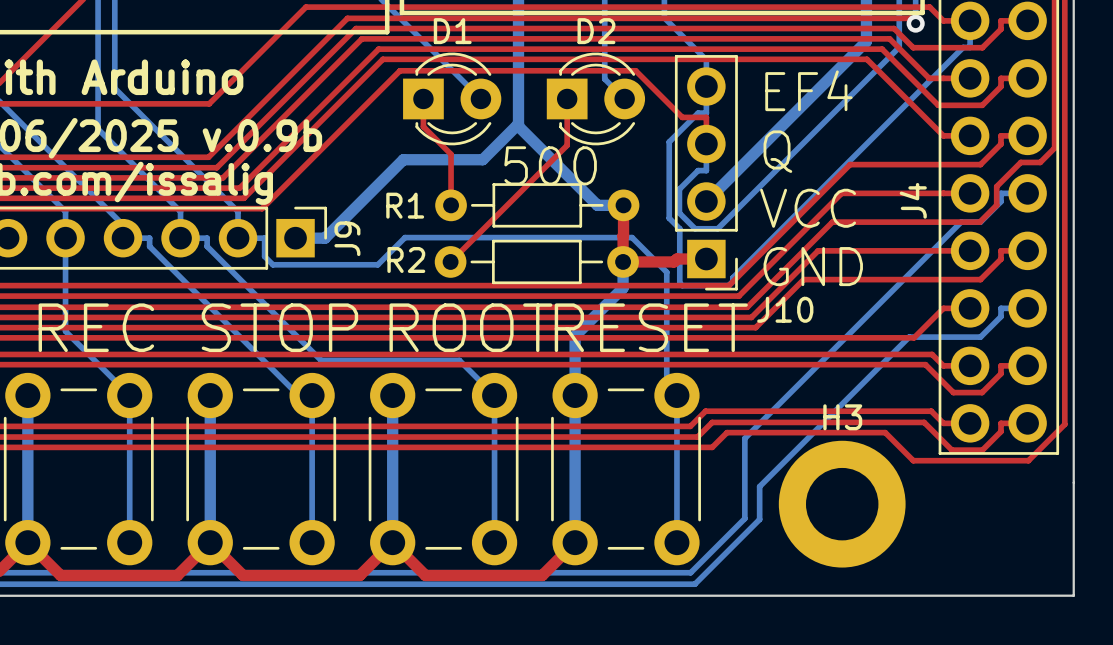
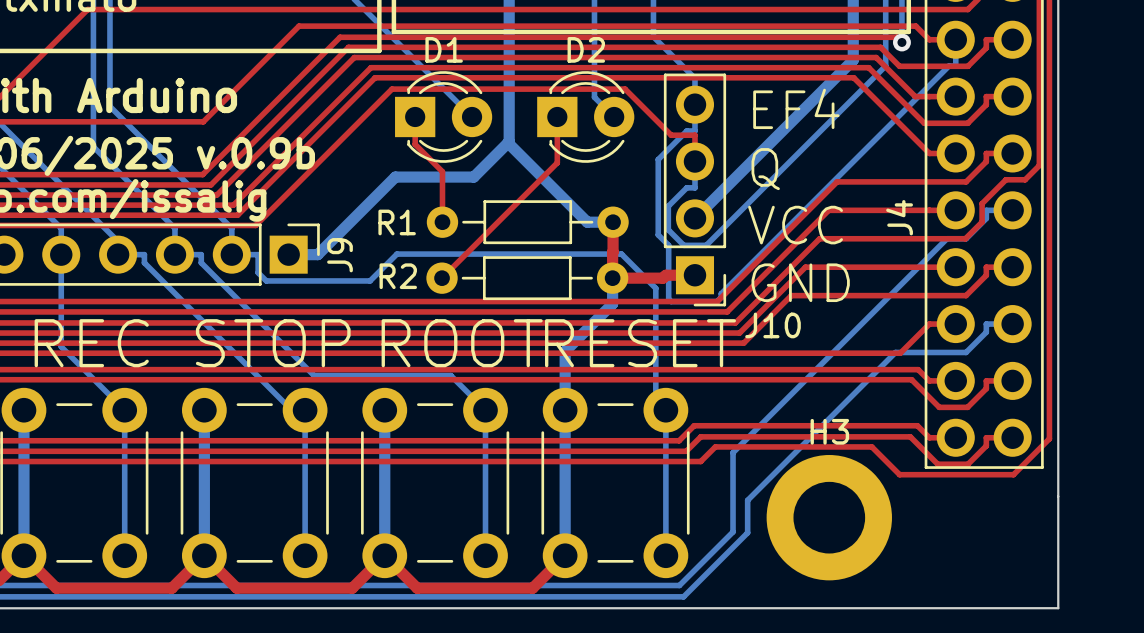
text: 500 (550, 165) -> none

